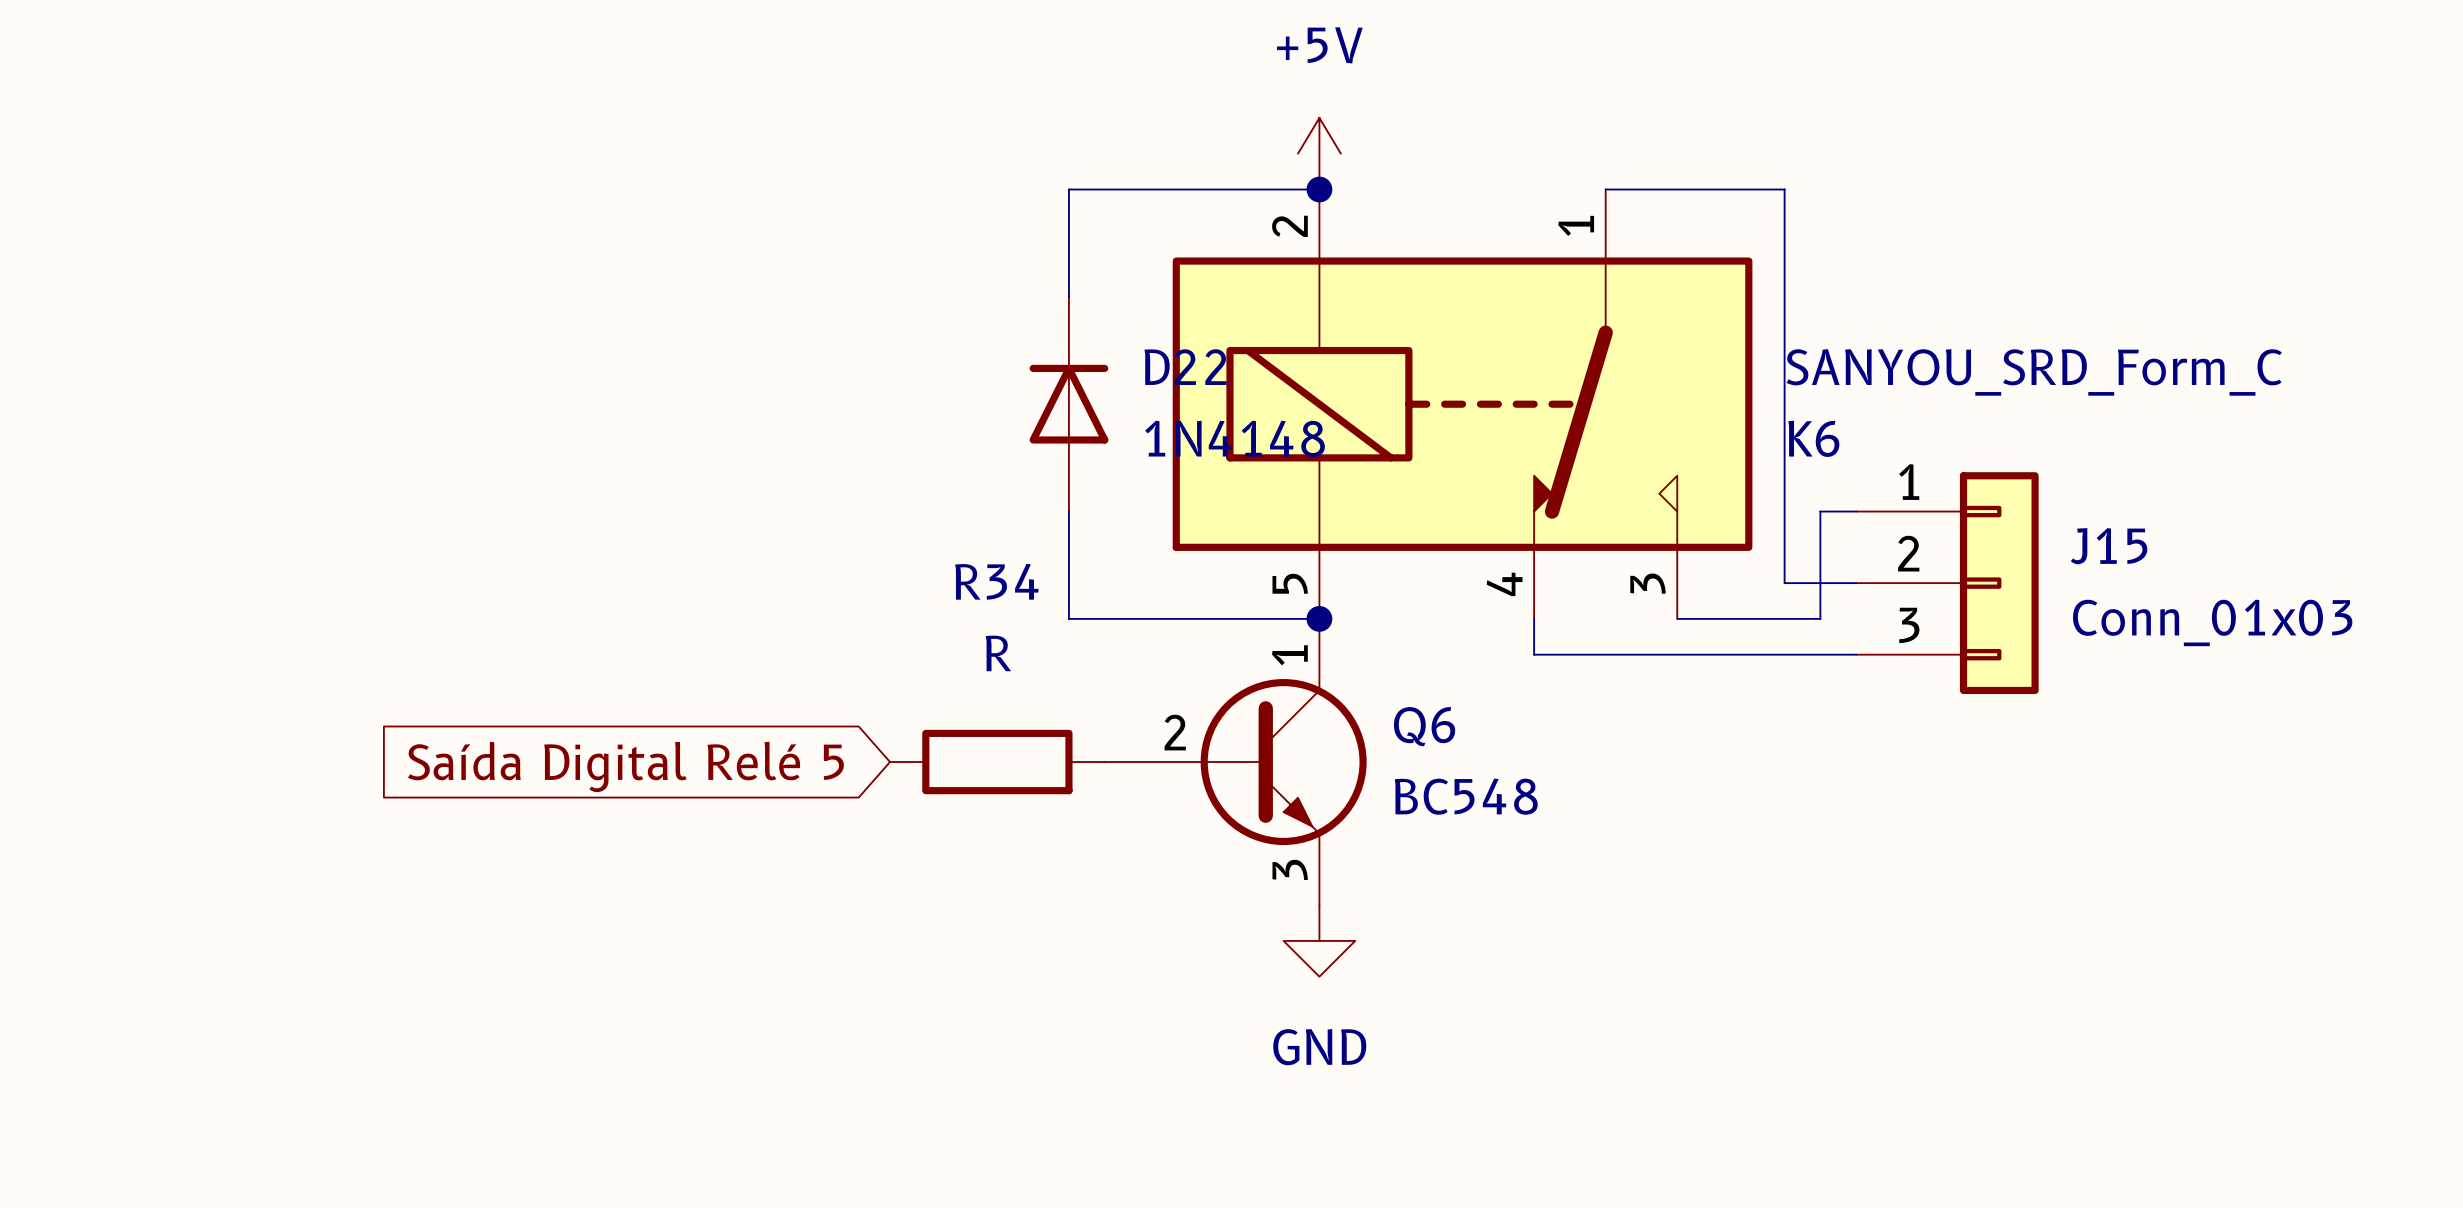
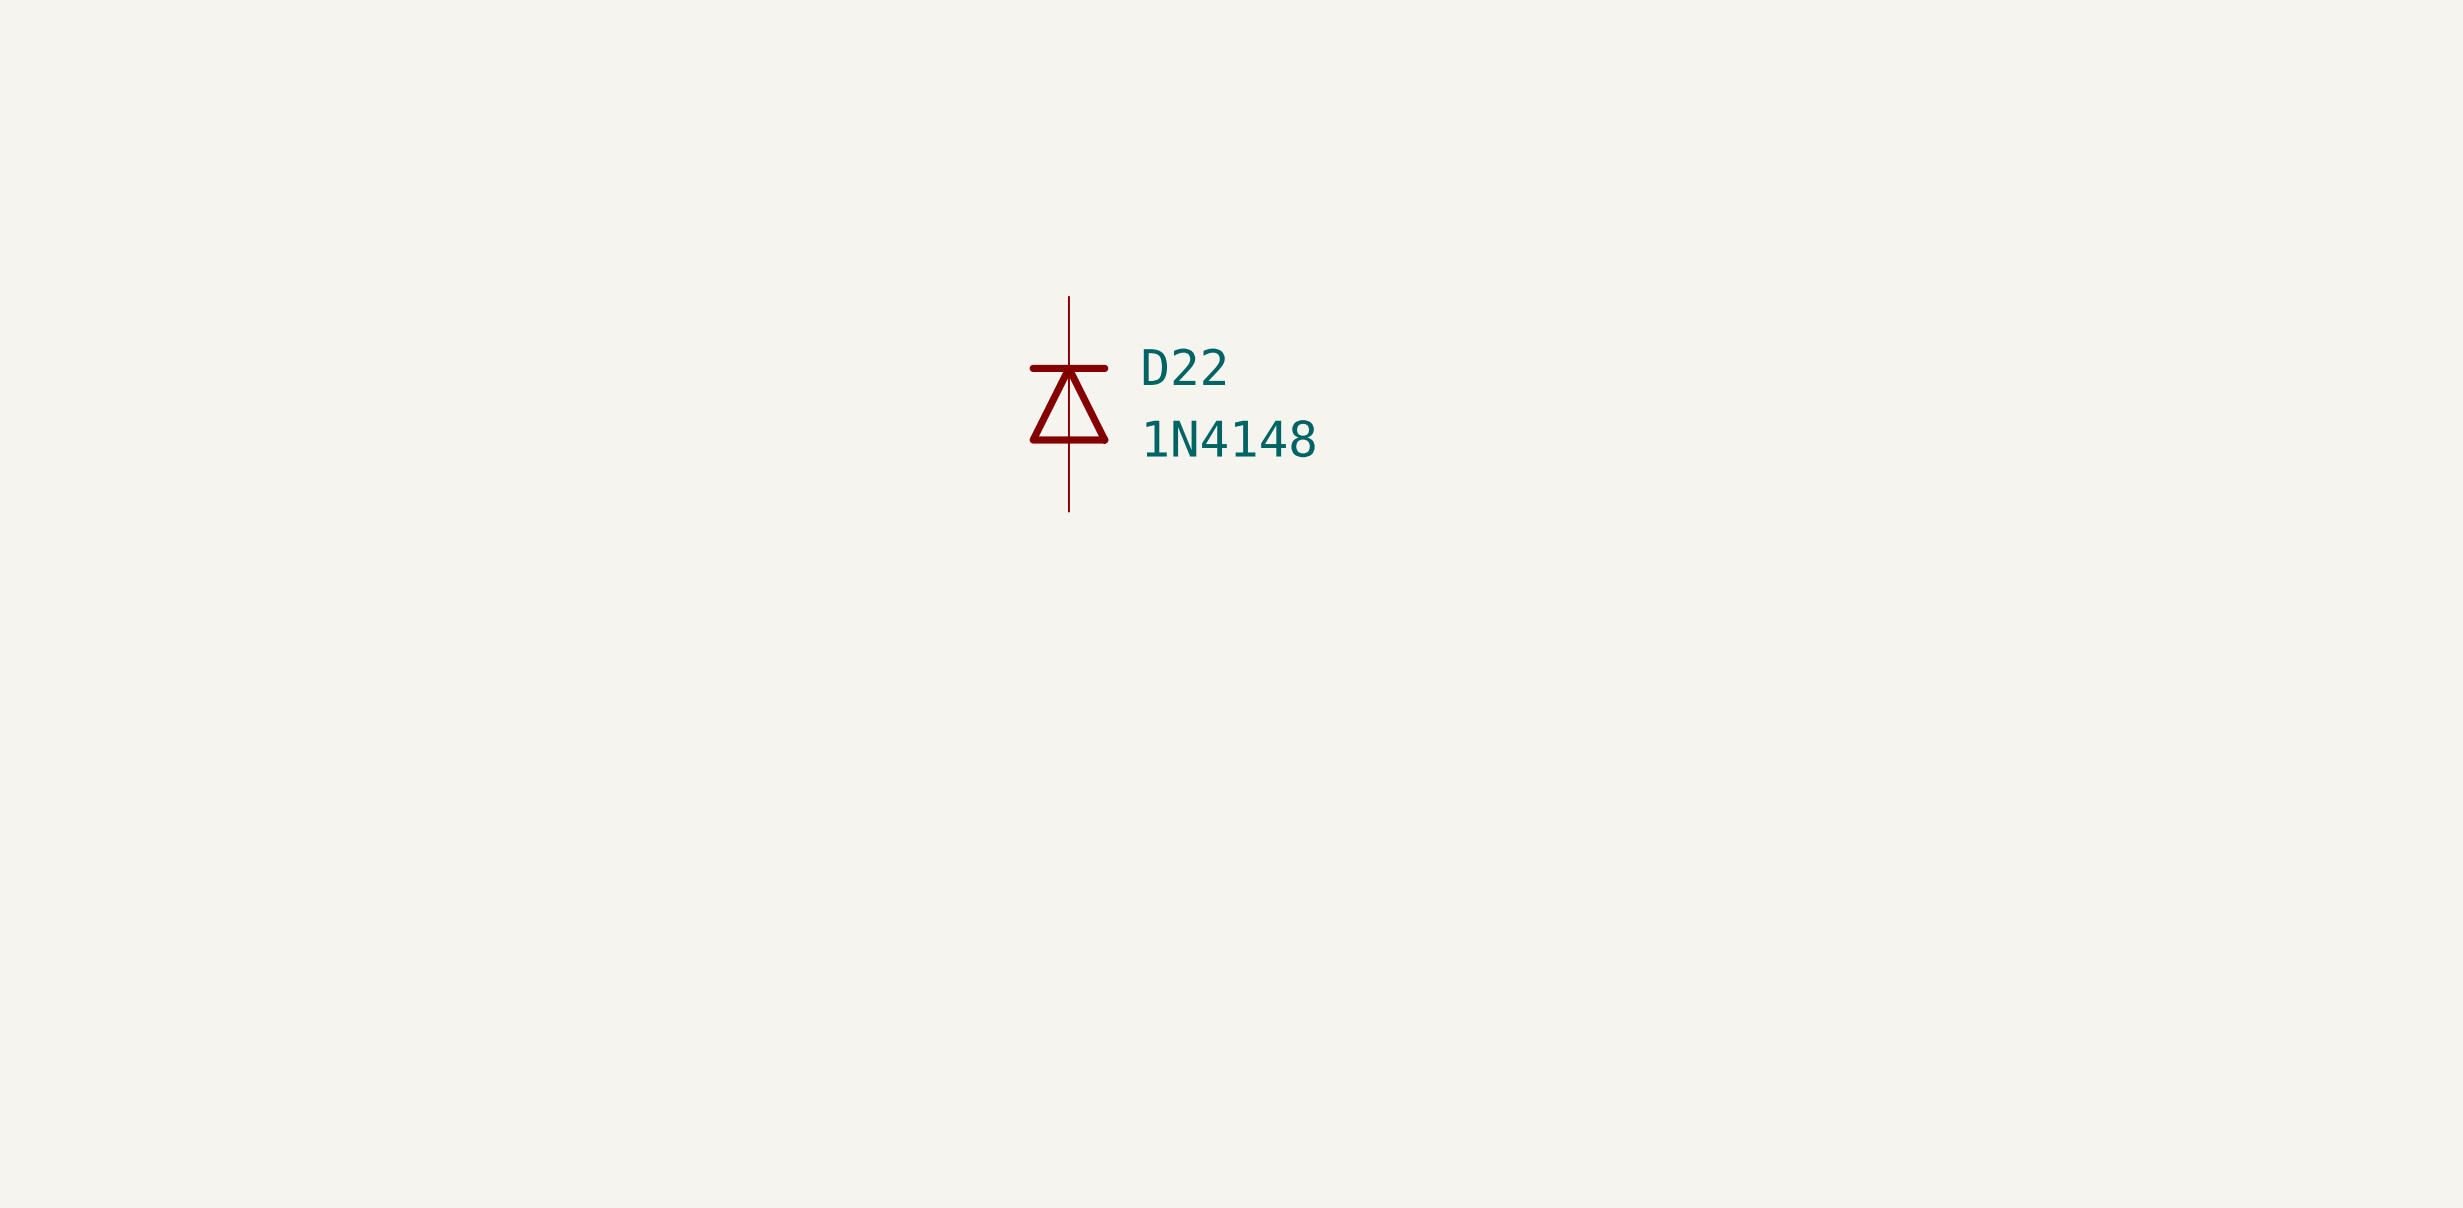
power symbol: +5V (1319, 153) -> none
wire: (1319, 189) (1068, 189) (1068, 296) -> none
junction: (1319, 189) -> none
wire: (1605, 189) (1784, 189) (1784, 583) (1856, 583) -> none
K6: SANYOU_SRD_Form_C (1462, 404) -> none
wire: (1068, 511) (1068, 618) (1319, 618) -> none
wire: (1856, 511) (1820, 511) (1820, 618) (1677, 618) -> none
J15: Conn_01x03 (1947, 583) -> none
junction: (1319, 618) -> none
wire: (1534, 618) (1534, 654) (1856, 654) -> none
R34: R (997, 762) -> none
Q6: BC548 (1235, 762) -> none
global label: Saída Digital Relé 5 (625, 766) -> none
power symbol: GND (1319, 940) -> none

